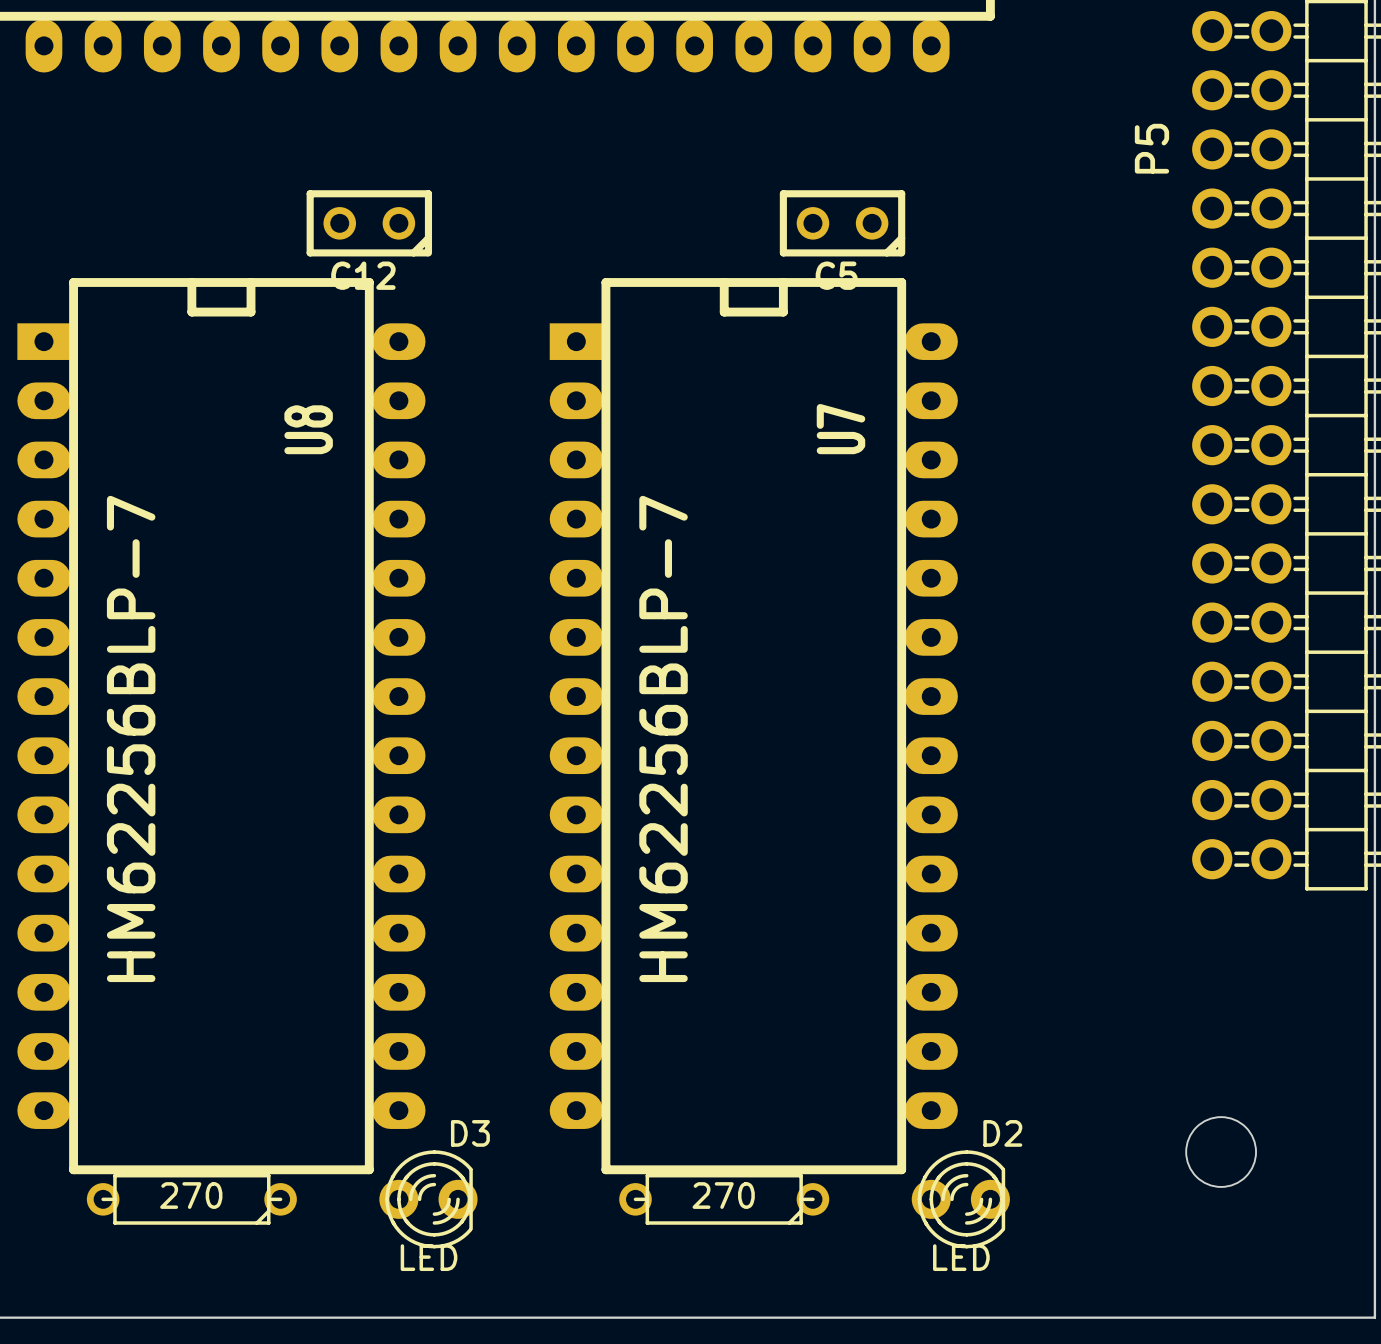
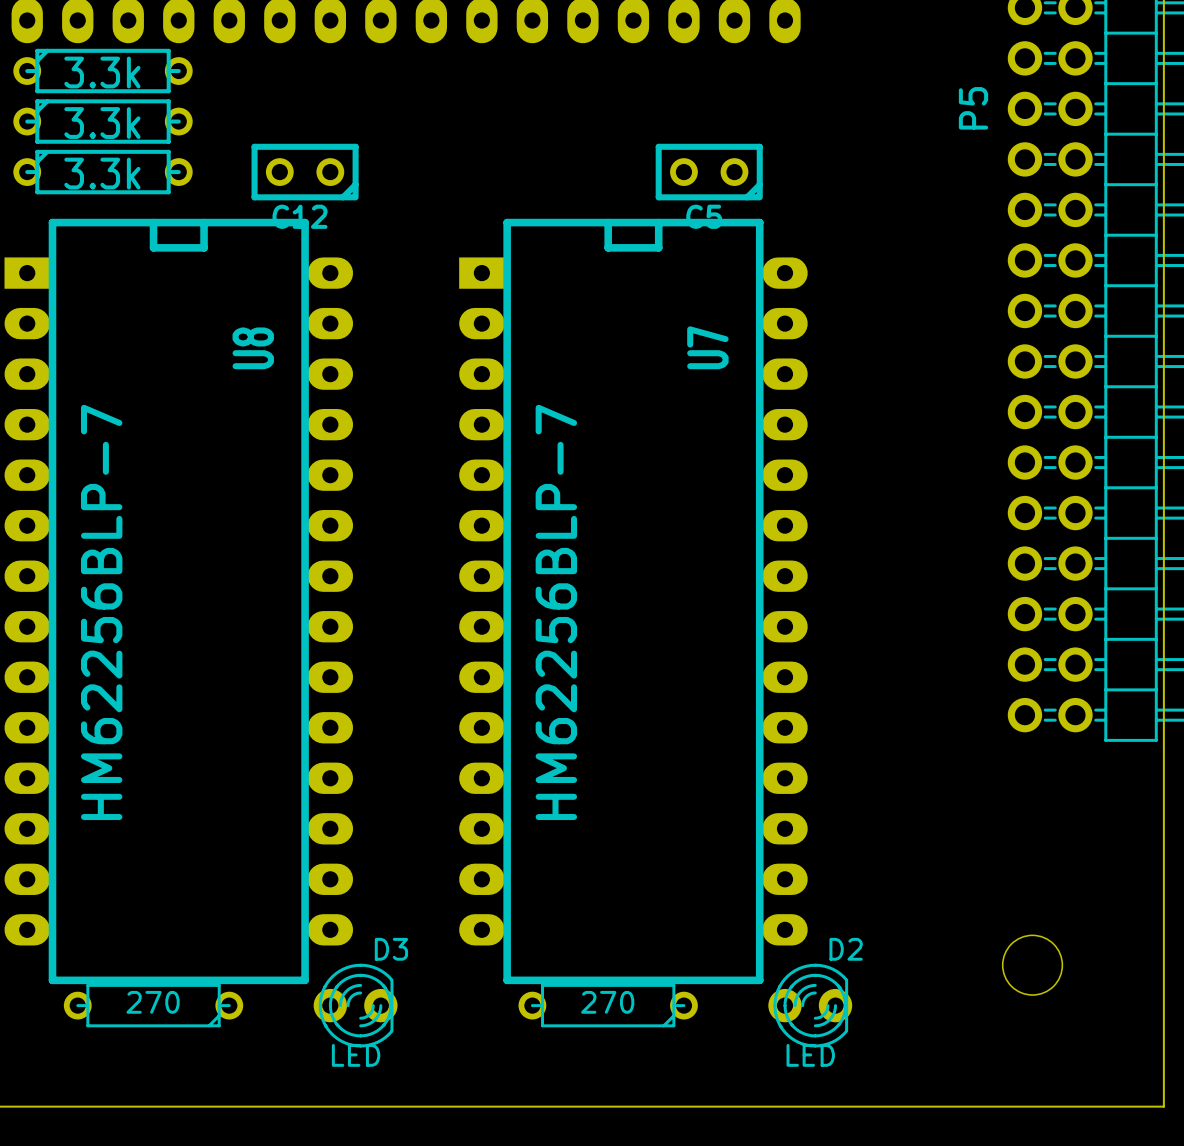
part: none -> 3.3k (103, 71)
part: none -> 3.3k (103, 121)
part: none -> 3.3k (103, 172)

